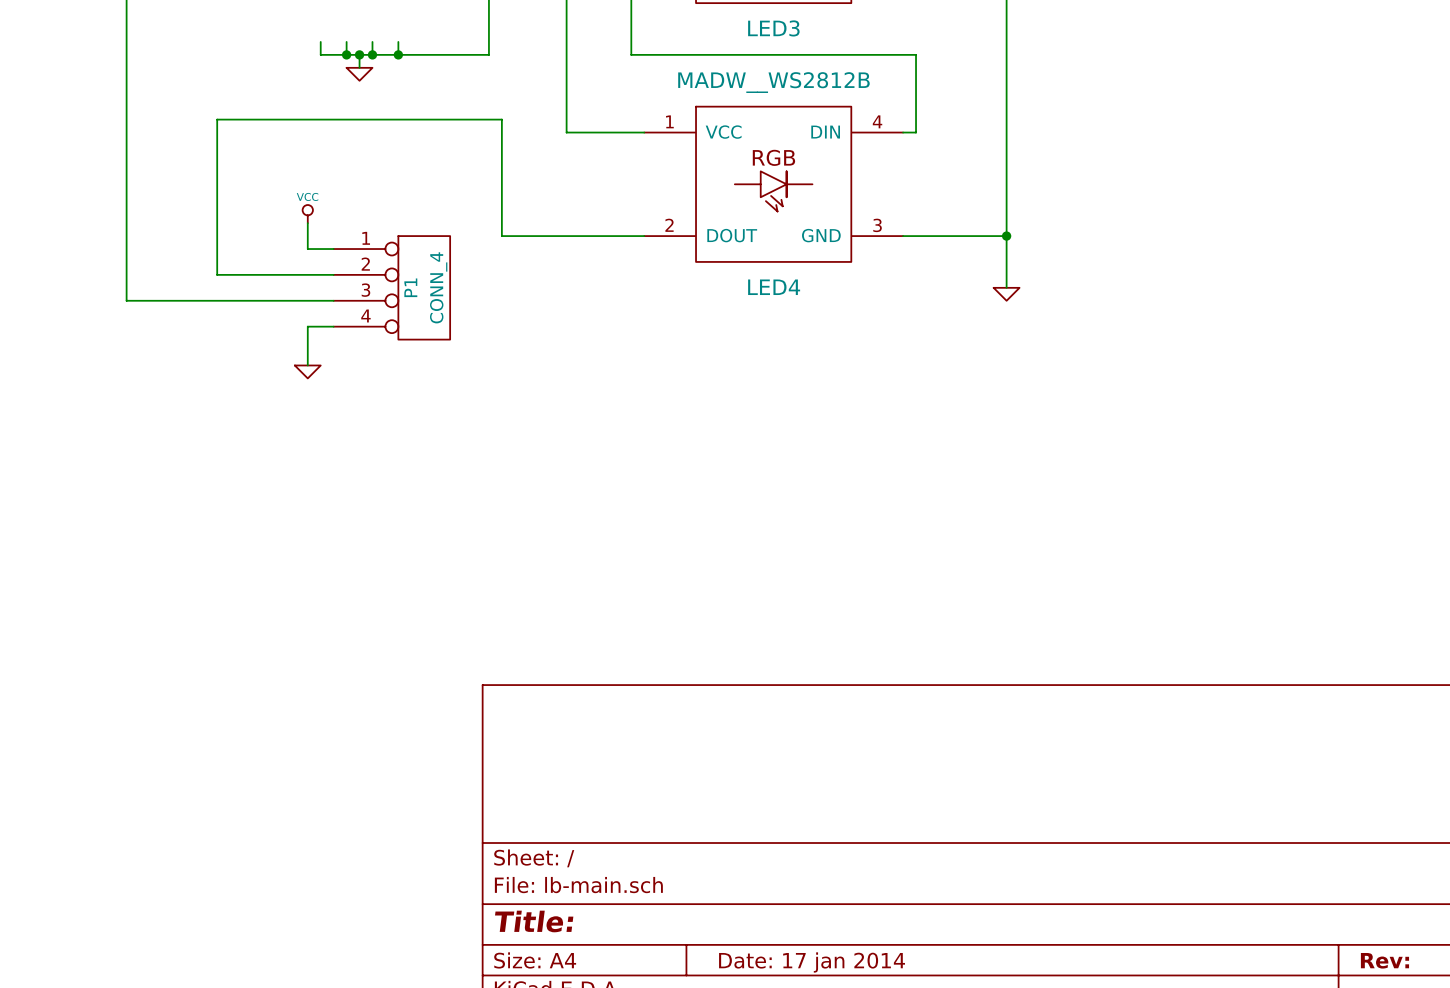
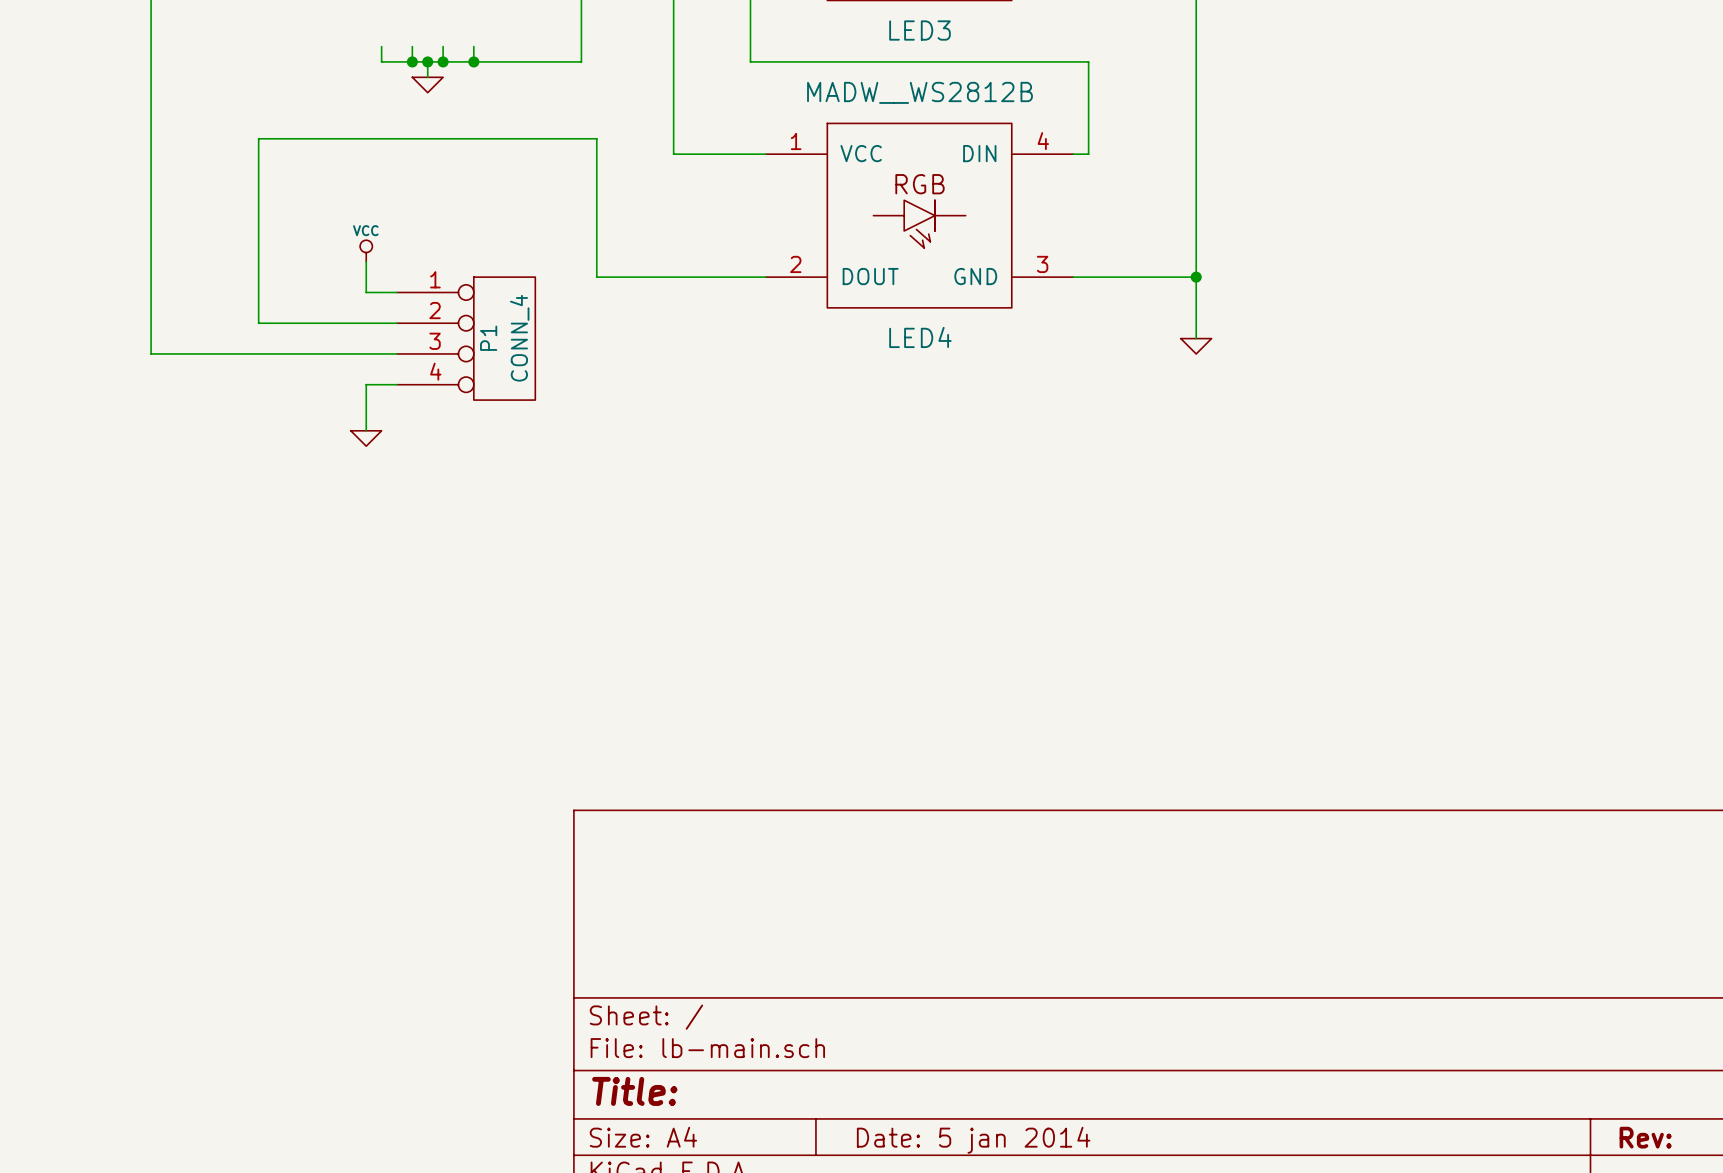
title block: Date: 17 jan 2014 (812, 962) -> Date: 5 jan 2014 (973, 1140)

